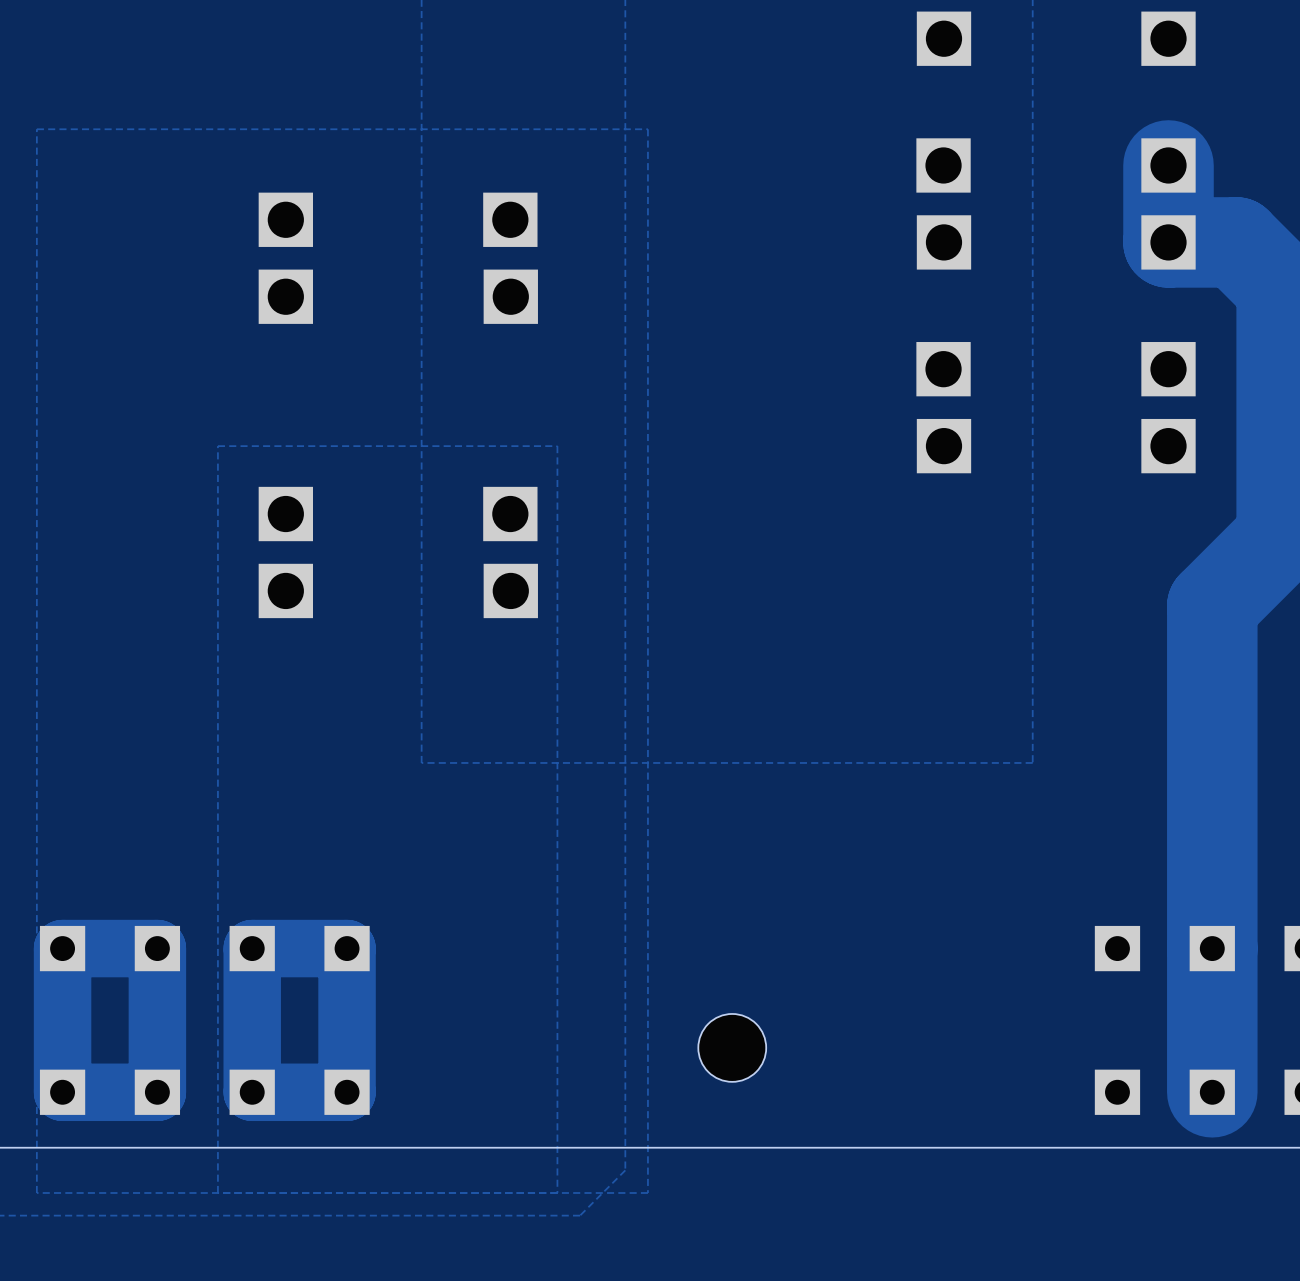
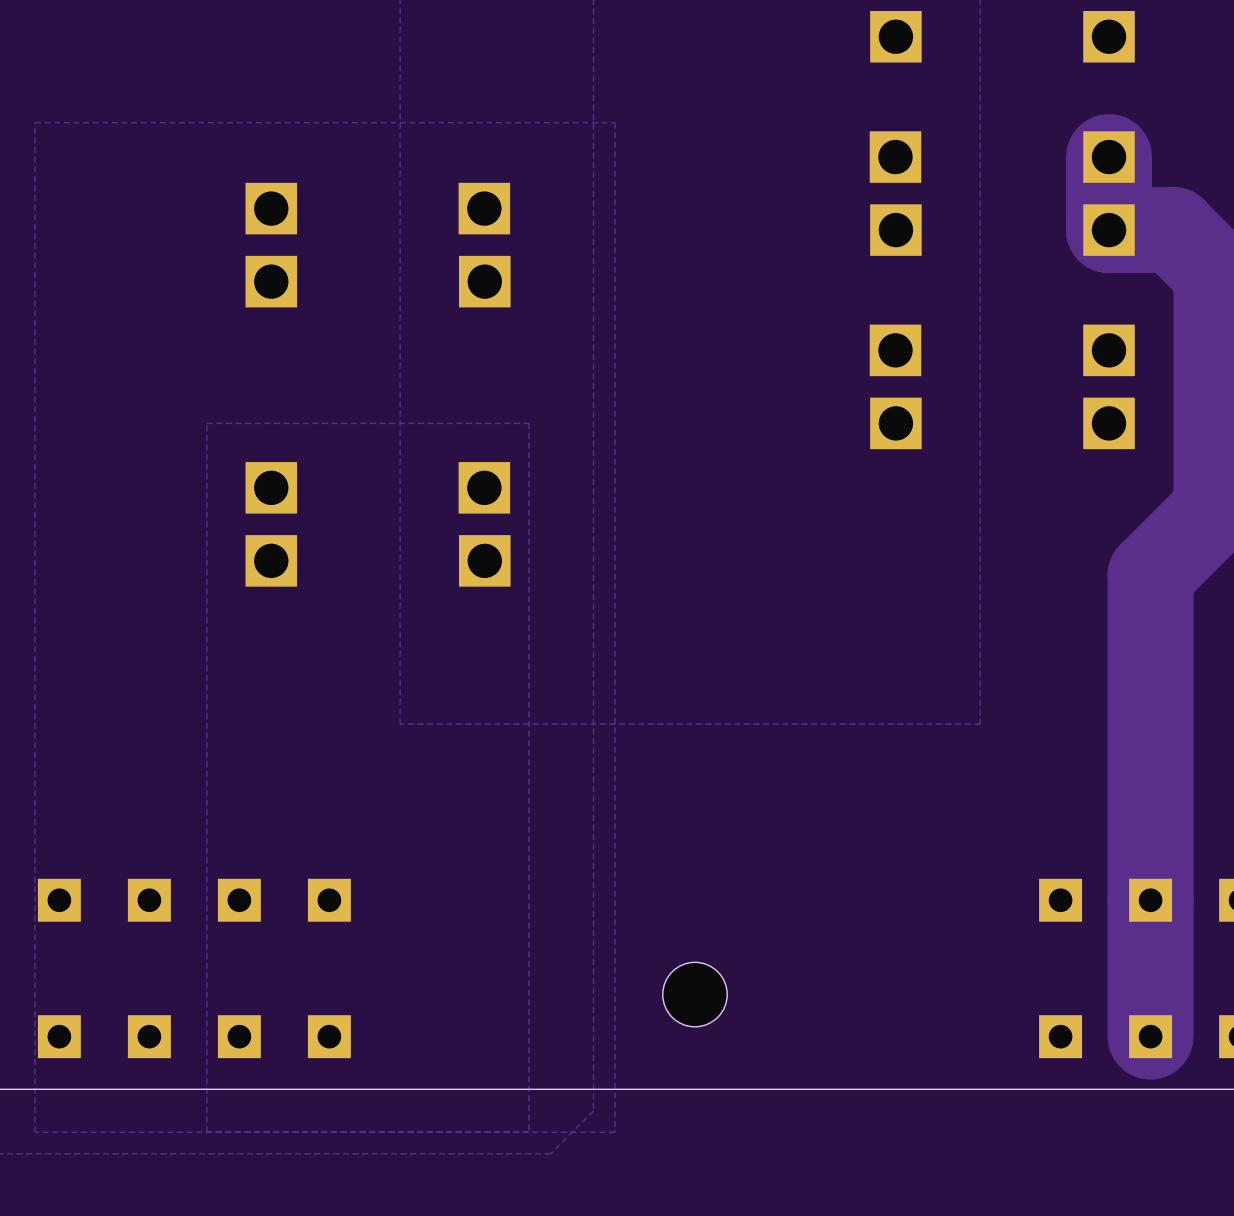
track: (157, 948) (62, 948) (62, 1092) (157, 1092) (157, 948) -> none
track: (347, 948) (252, 948) (252, 1092) (347, 1092) (347, 948) -> none

